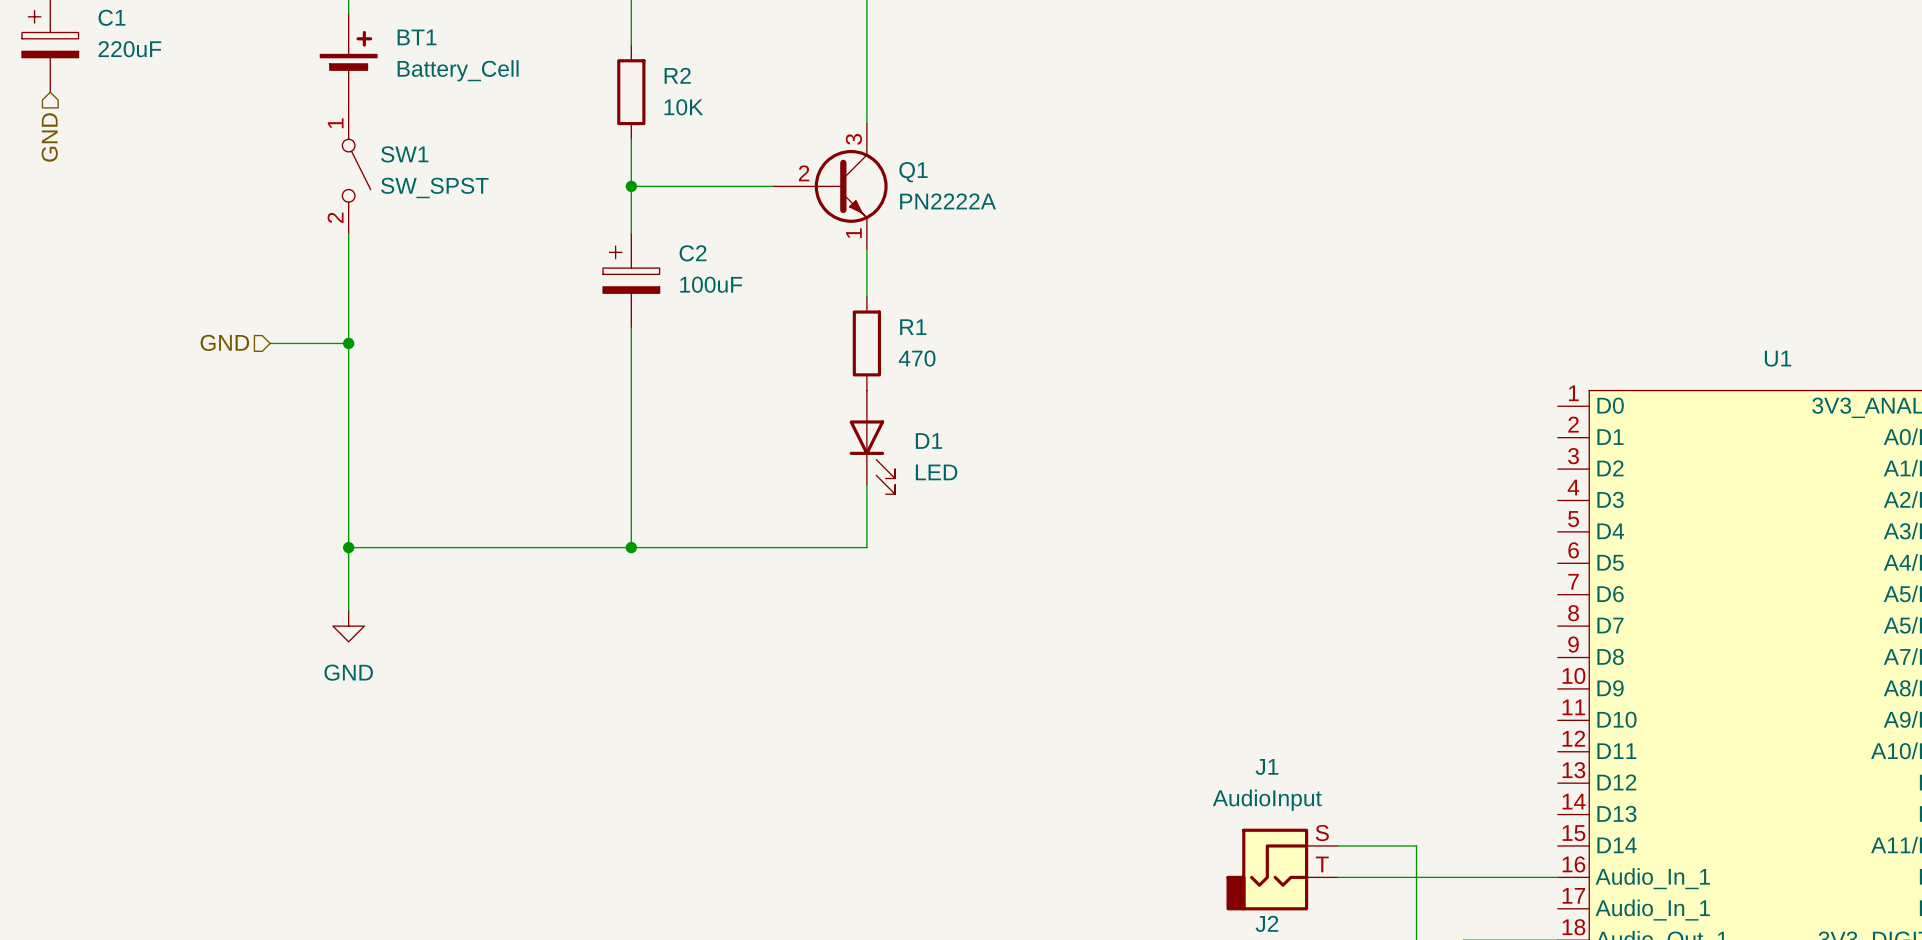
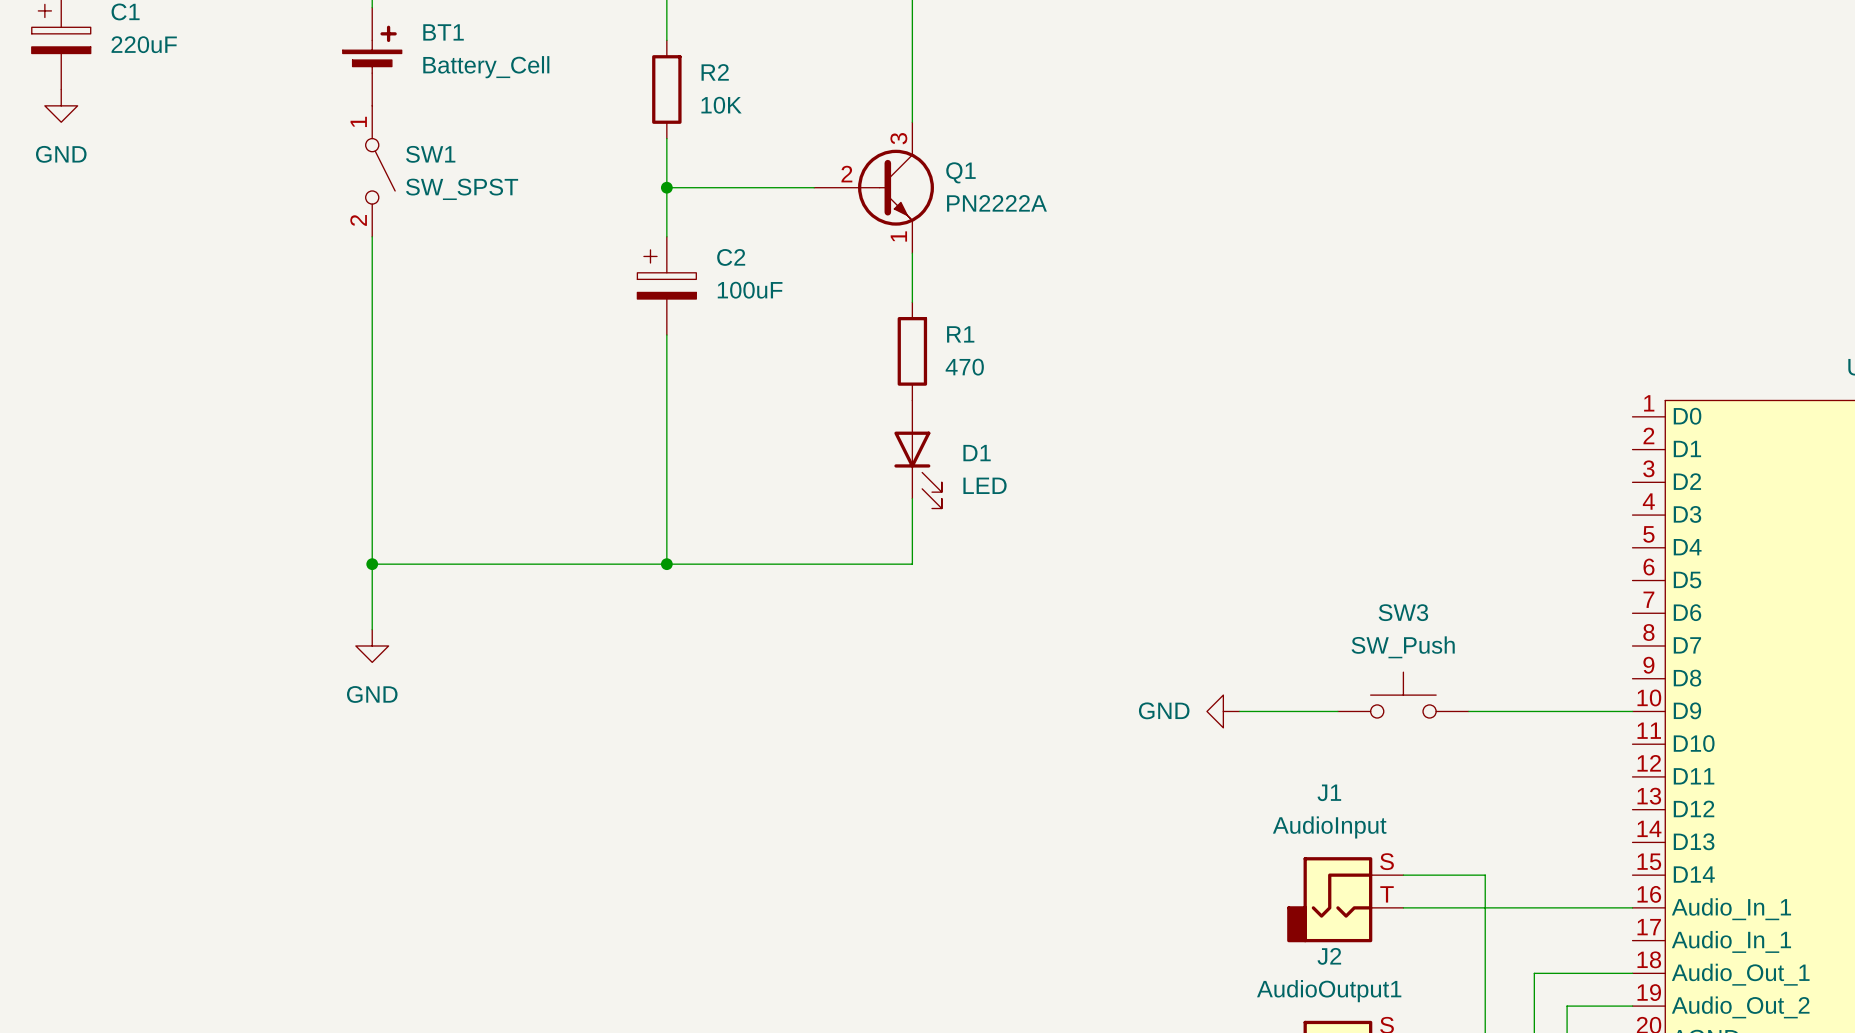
power symbol: none -> GND (61, 105)
hierarchical label: GND (49, 137) -> none
hierarchical label: GND (224, 342) -> none
wire: (270, 343) (348, 343) -> none
junction: (348, 343) -> none
SW3: none -> SW_Push (1403, 695)
power symbol: none -> GND (1223, 711)
wire: none -> (1239, 711) (1337, 711)
wire: none -> (1468, 711) (1632, 711)

